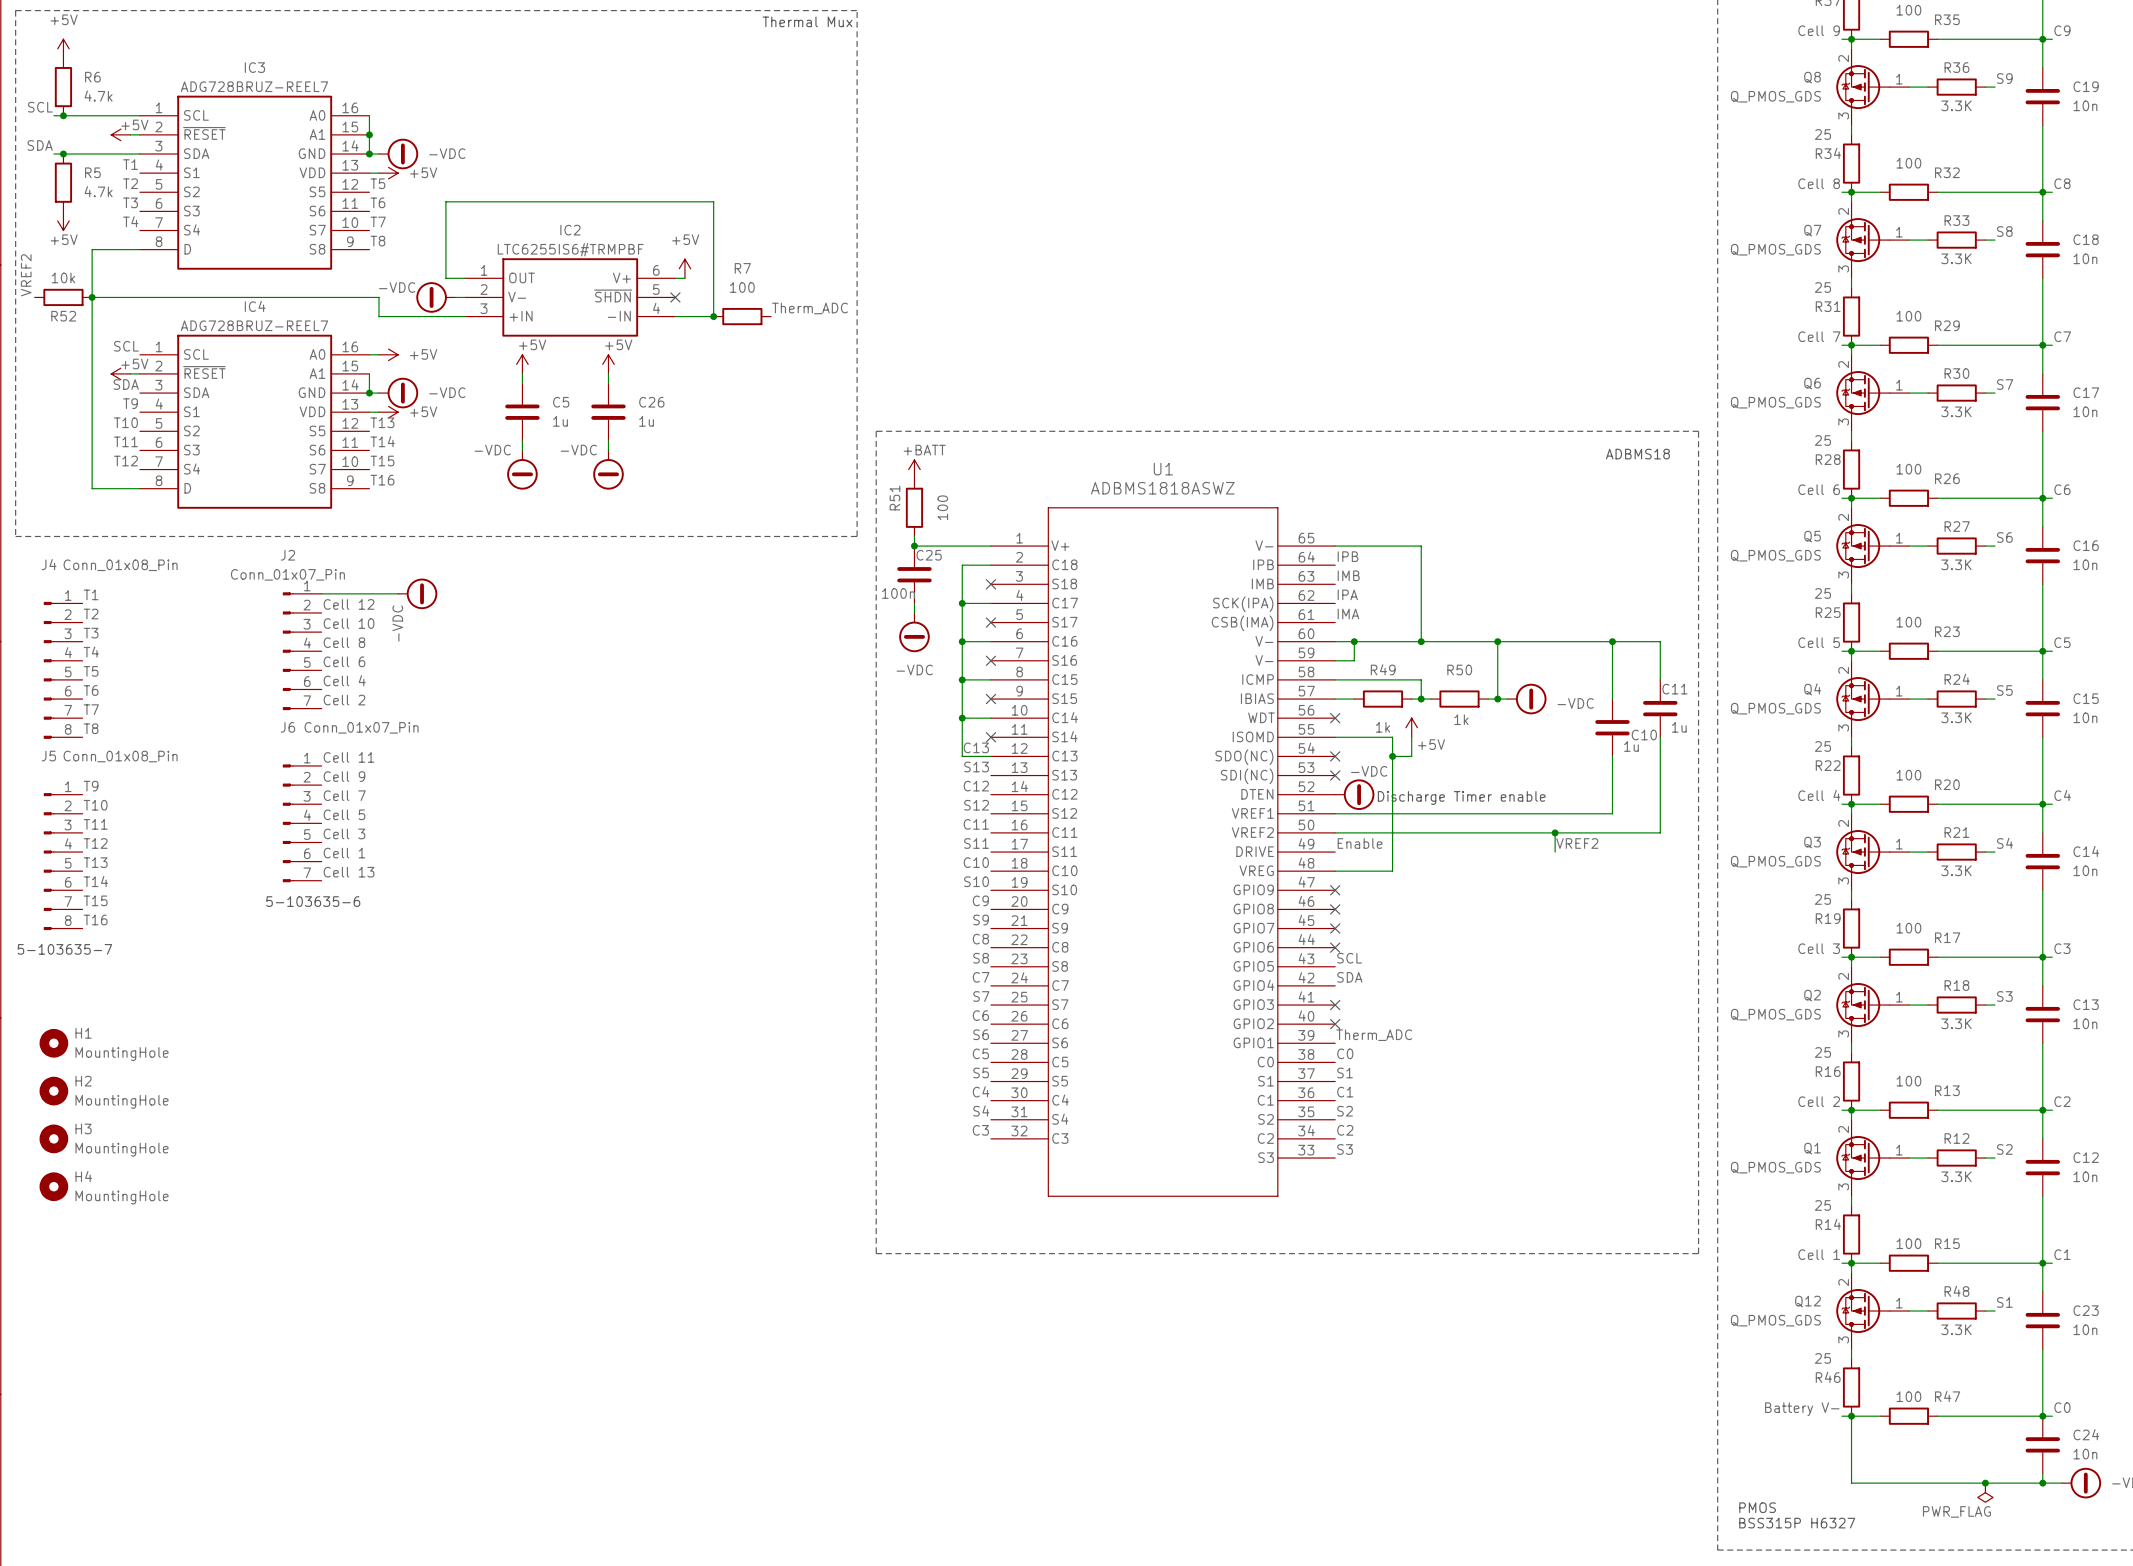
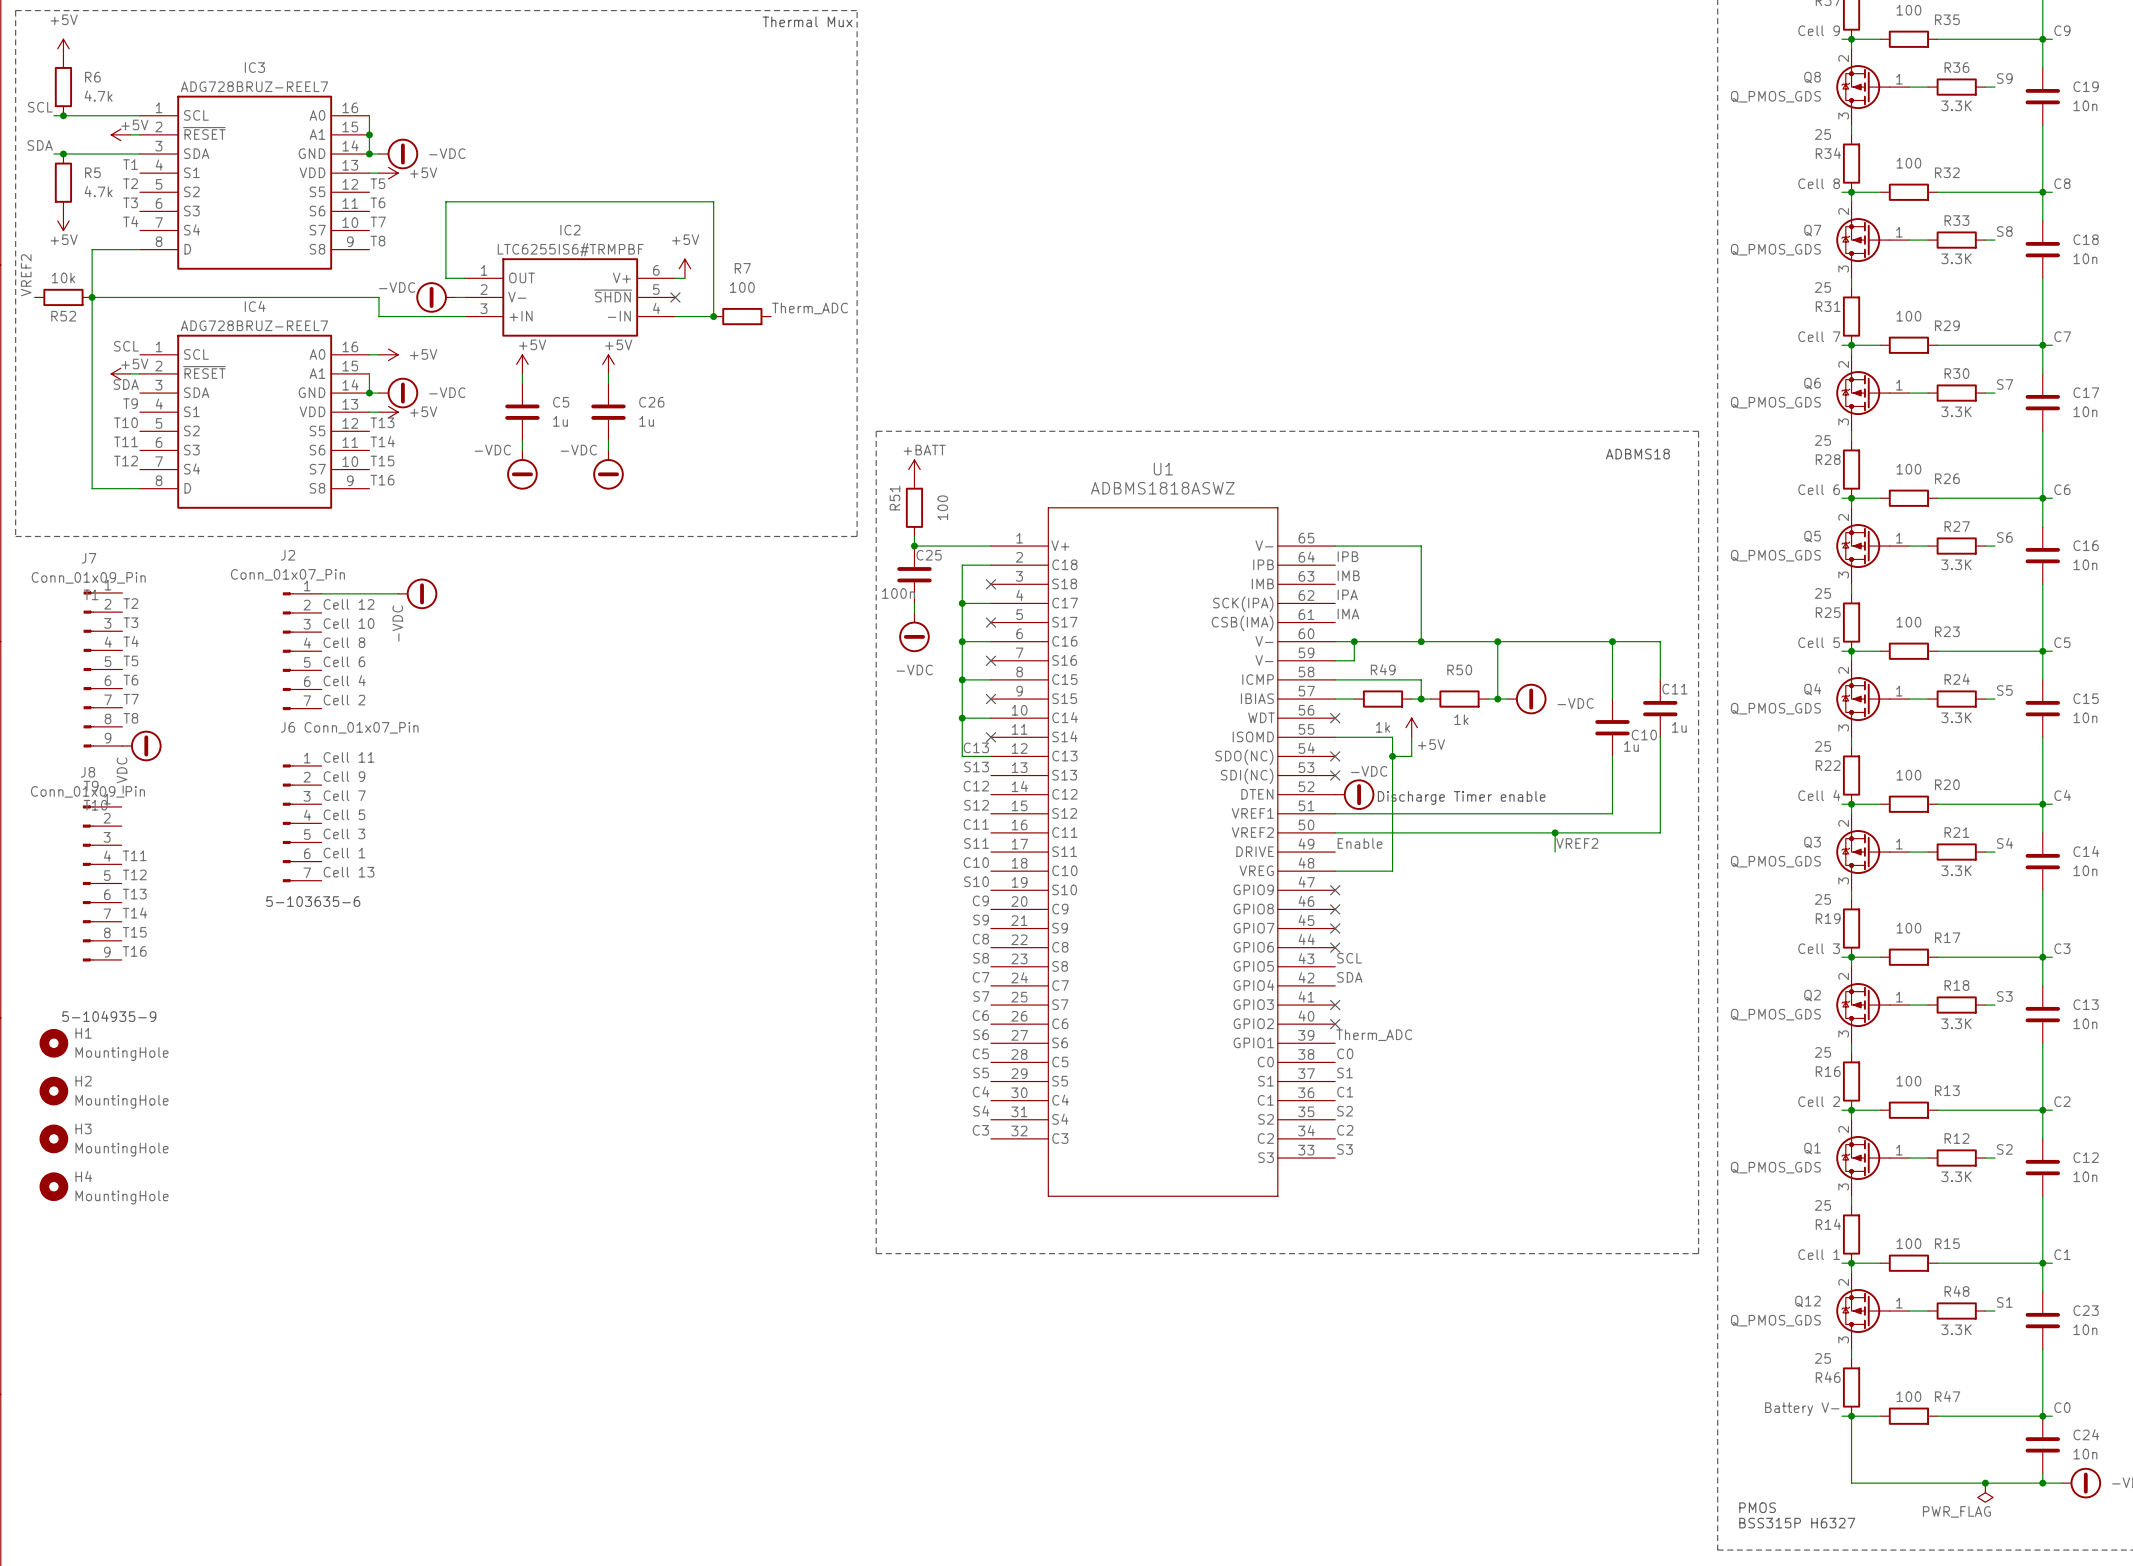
label position: T2 (91, 614) -> T2 (130, 603)
label position: T3 (91, 633) -> T3 (130, 622)
label position: T4 (91, 652) -> T4 (131, 641)
J7: none -> Conn_01x09_Pin (102, 669)
J4: Conn_01x08_Pin (63, 670) -> none
label position: T5 (91, 671) -> T5 (130, 660)
label position: T6 (91, 690) -> T6 (130, 680)
label position: T7 (91, 709) -> T7 (131, 699)
label position: T8 (91, 728) -> T8 (130, 718)
power symbol: none -> -VDC (141, 745)
label position: T11 (95, 824) -> T11 (134, 855)
label position: T12 (95, 843) -> T12 (134, 874)
J5: Conn_01x08_Pin (63, 861) -> none
label position: T13 (95, 862) -> T13 (134, 894)
label position: T14 (95, 881) -> T14 (134, 912)
J8: none -> Conn_01x09_Pin (102, 883)
label position: T15 (95, 900) -> T15 (134, 932)
label position: T16 (95, 919) -> T16 (134, 951)
text: 5-103635-7 (64, 949) -> none
text: none -> 5-104935-9 (109, 1016)

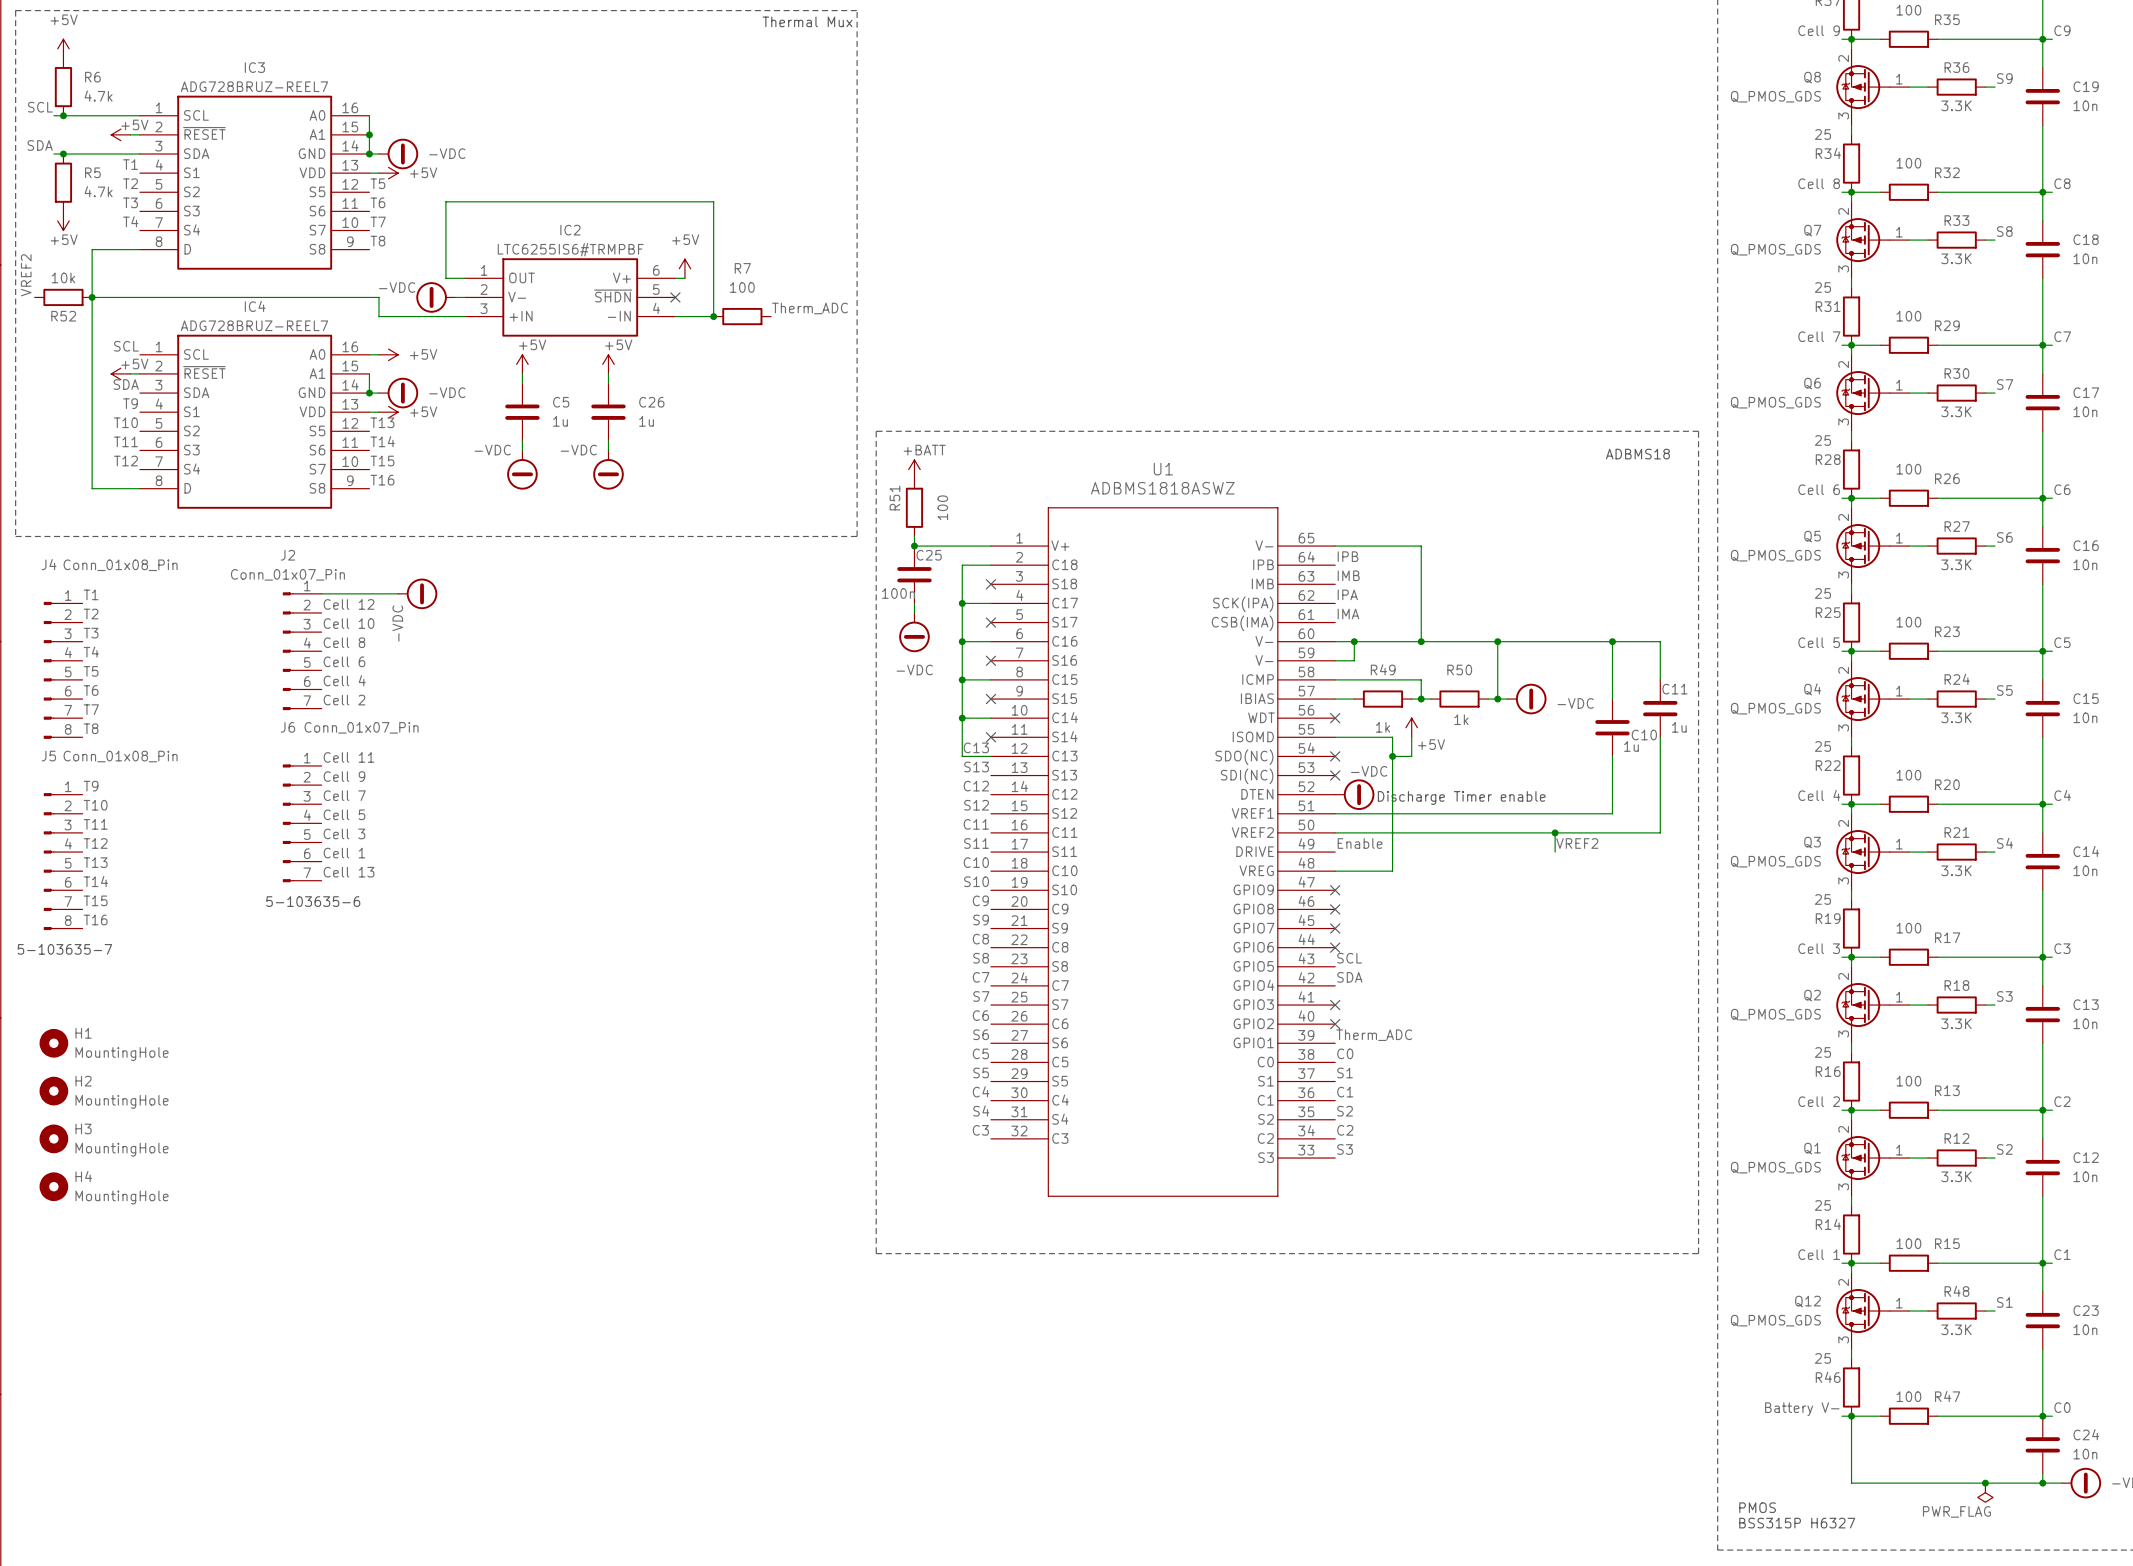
label position: T2 (130, 603) -> T2 (91, 614)
label position: T3 (130, 622) -> T3 (91, 633)
label position: T4 (131, 641) -> T4 (91, 652)
label position: T5 (130, 660) -> T5 (91, 671)
J7: Conn_01x09_Pin (102, 669) -> none
J4: none -> Conn_01x08_Pin (63, 670)
label position: T6 (130, 680) -> T6 (91, 690)
label position: T7 (131, 699) -> T7 (91, 709)
label position: T8 (130, 718) -> T8 (91, 728)
power symbol: -VDC (141, 745) -> none
label position: T11 (134, 855) -> T11 (95, 824)
J5: none -> Conn_01x08_Pin (63, 861)
label position: T12 (134, 874) -> T12 (95, 843)
J8: Conn_01x09_Pin (102, 883) -> none
label position: T13 (134, 894) -> T13 (95, 862)
label position: T14 (134, 912) -> T14 (95, 881)
label position: T15 (134, 932) -> T15 (95, 900)
text: none -> 5-103635-7 (64, 949)
label position: T16 (134, 951) -> T16 (95, 919)
text: 5-104935-9 (109, 1016) -> none

